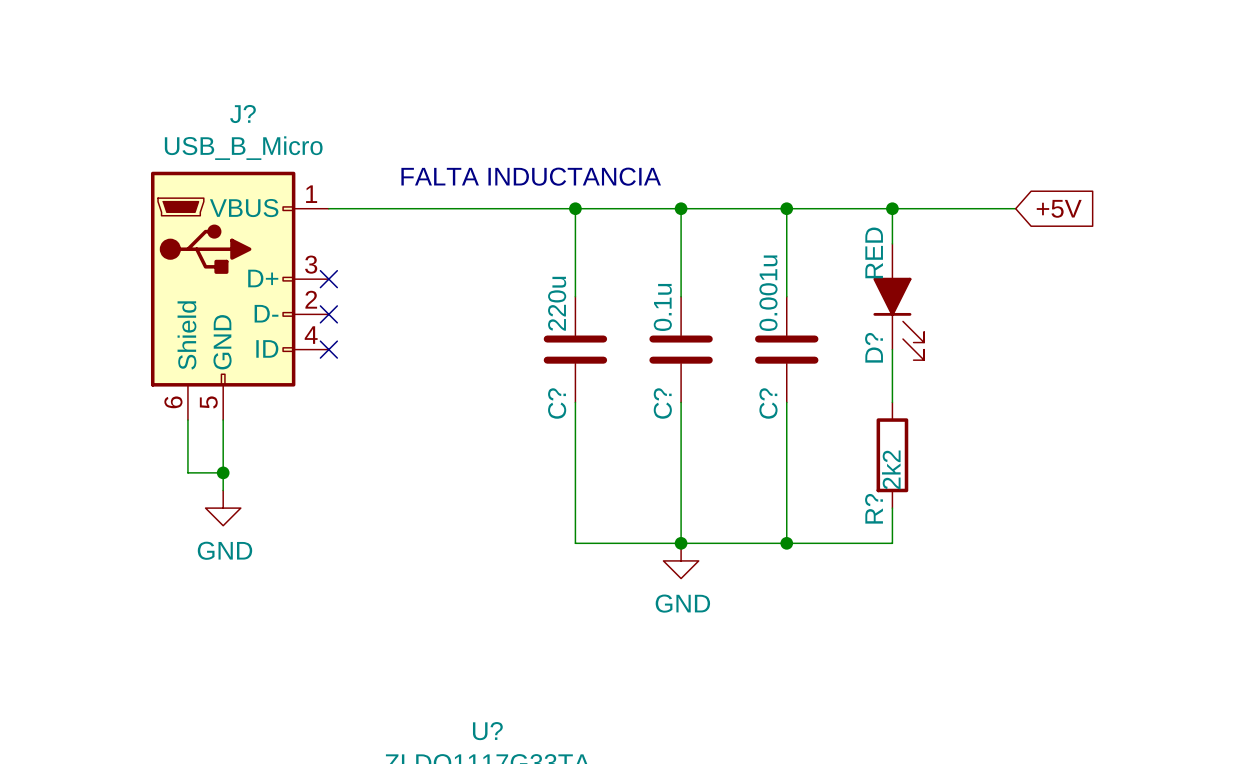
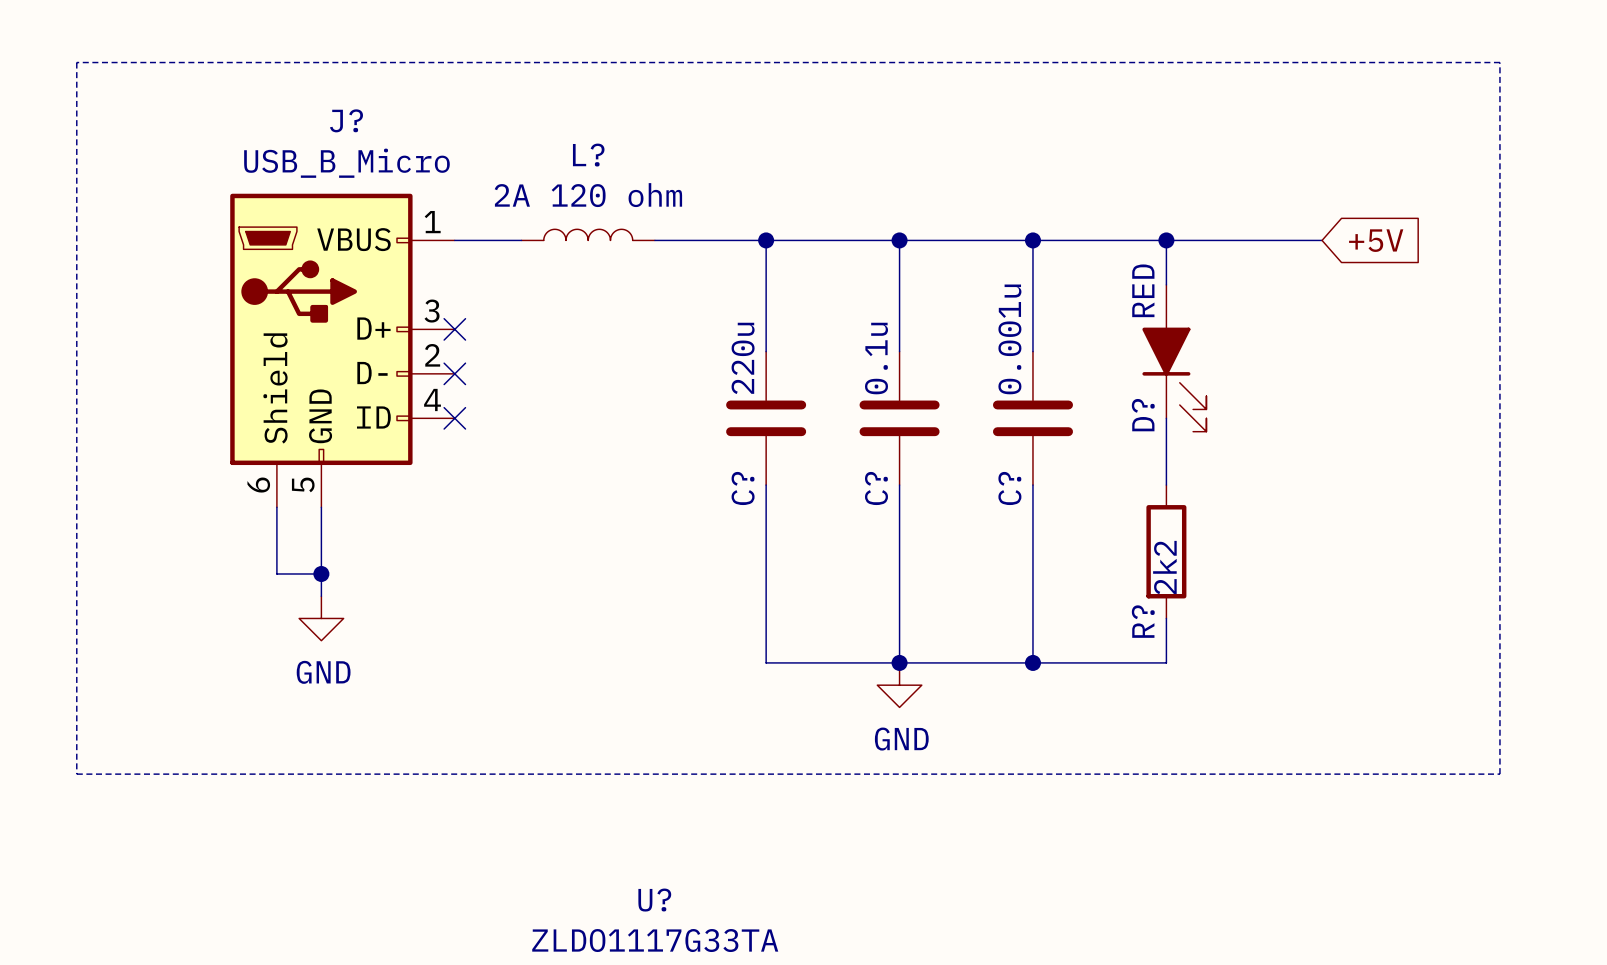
line: none -> (76, 62) (1499, 62) (1499, 774) (76, 774) (76, 62)
text: FALTA INDUCTANCIA (531, 176) -> none
L?: none -> 2A 120 ohm (588, 234)
wire: (381, 208) (487, 208) -> none

